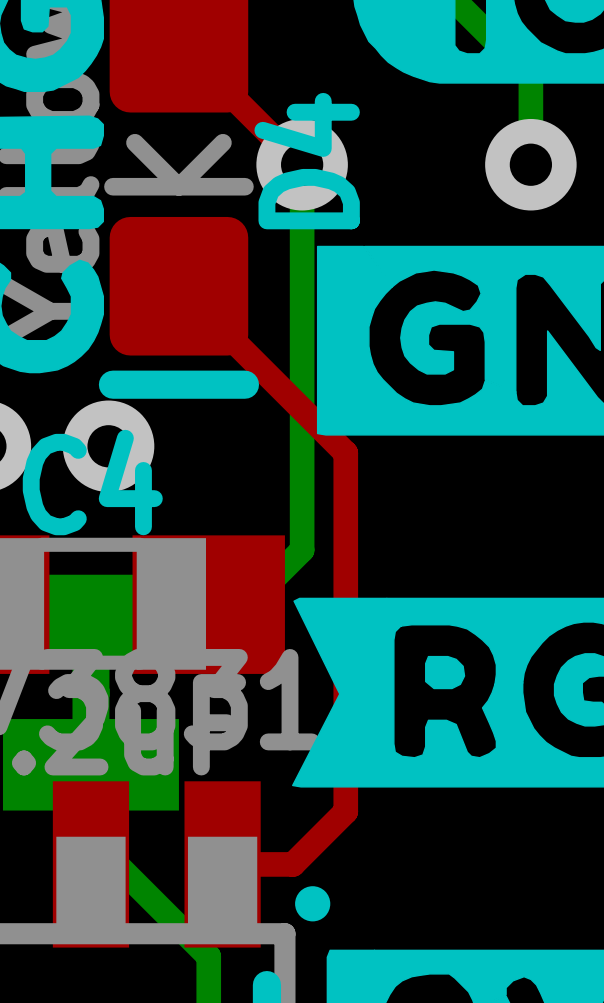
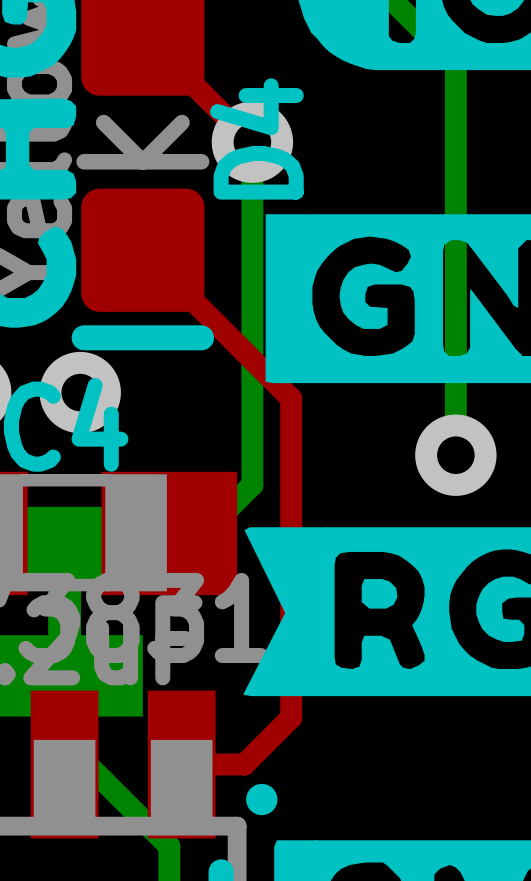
bottom track: none -> (455, 142) (455, 455)
via position: (530, 164) -> (455, 455)

